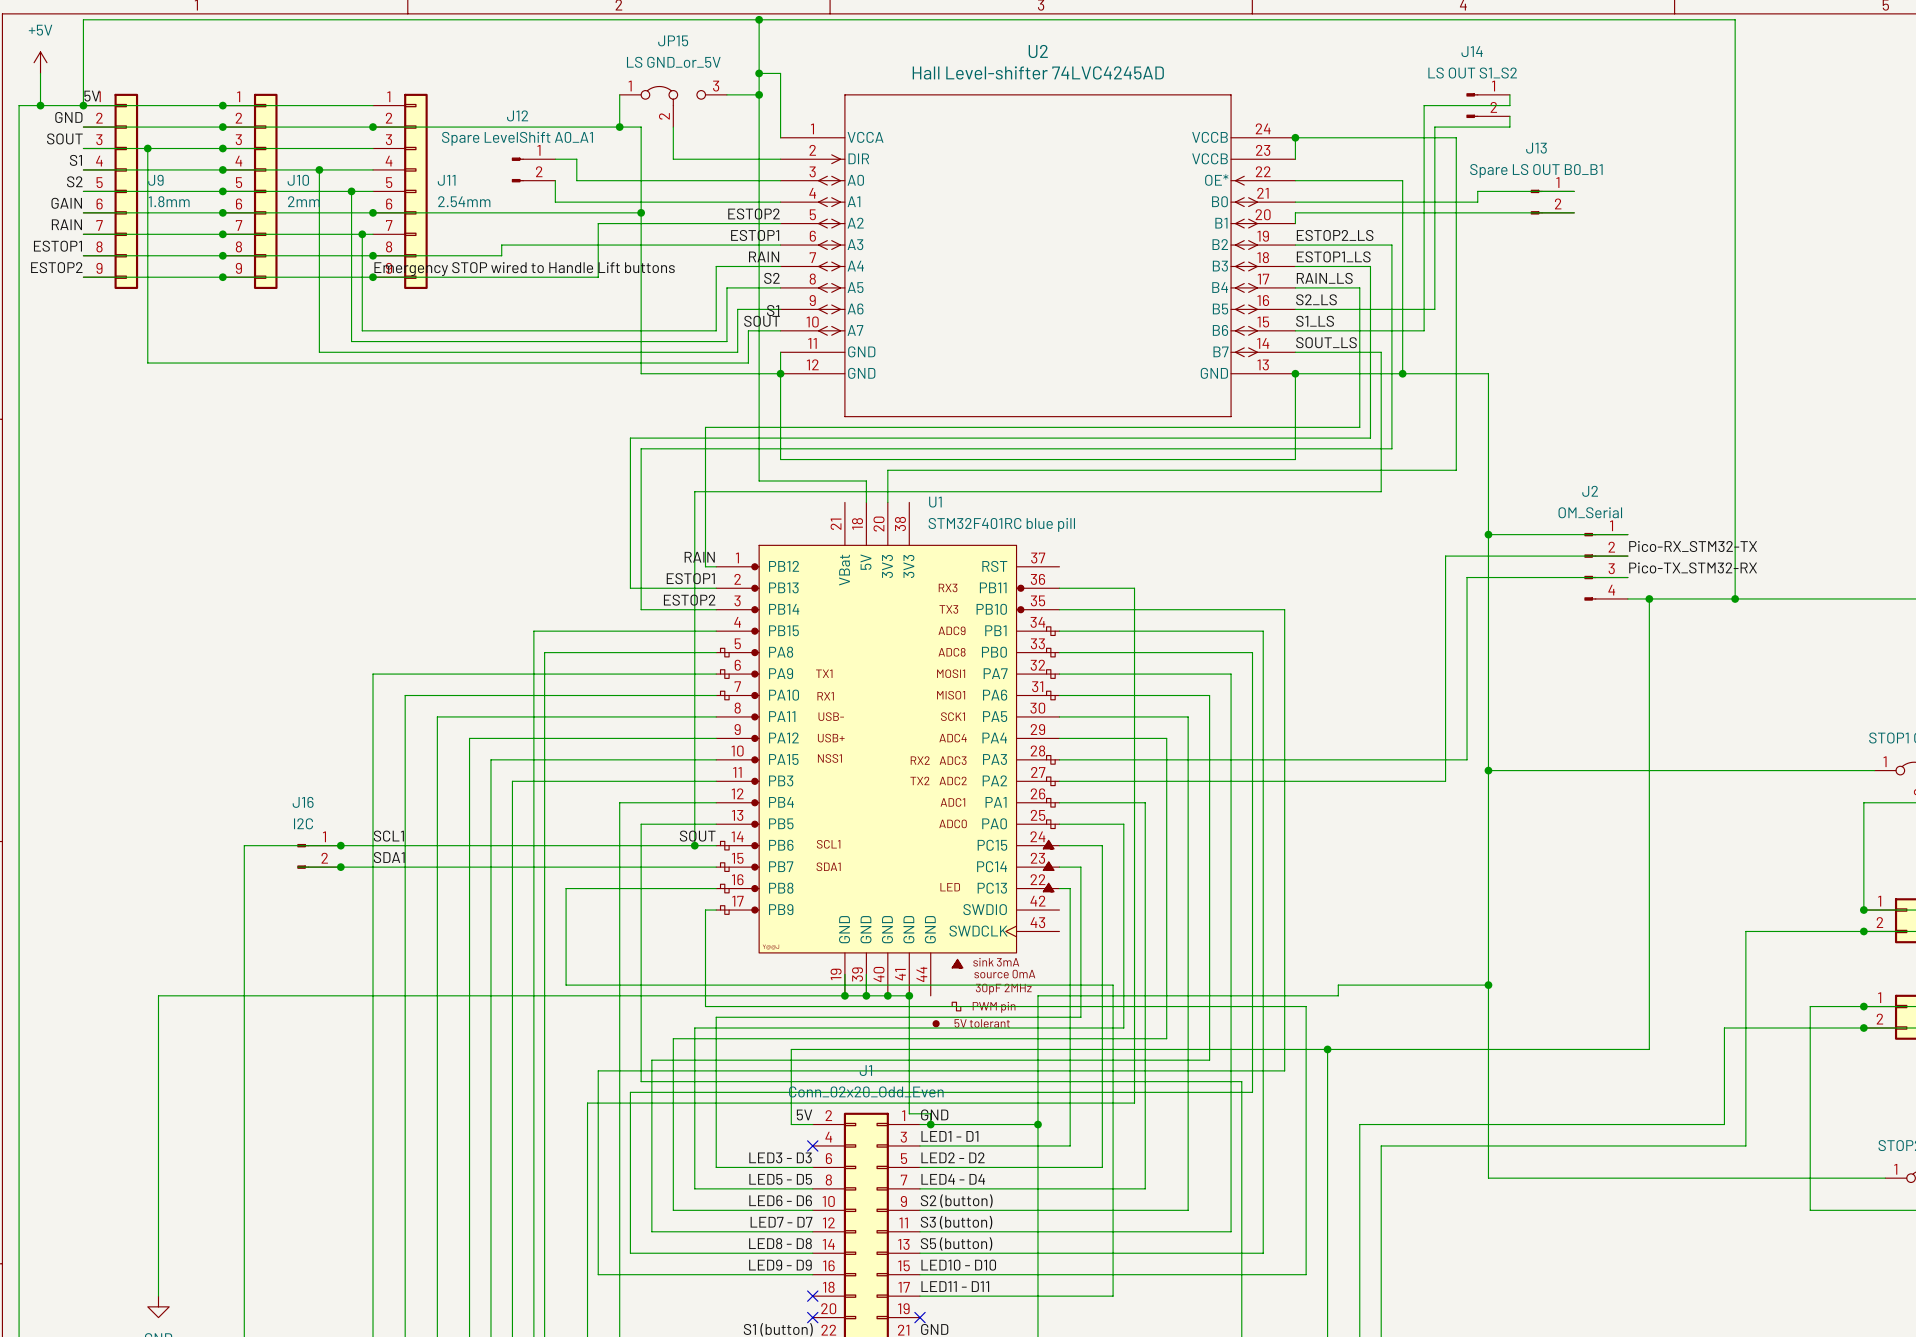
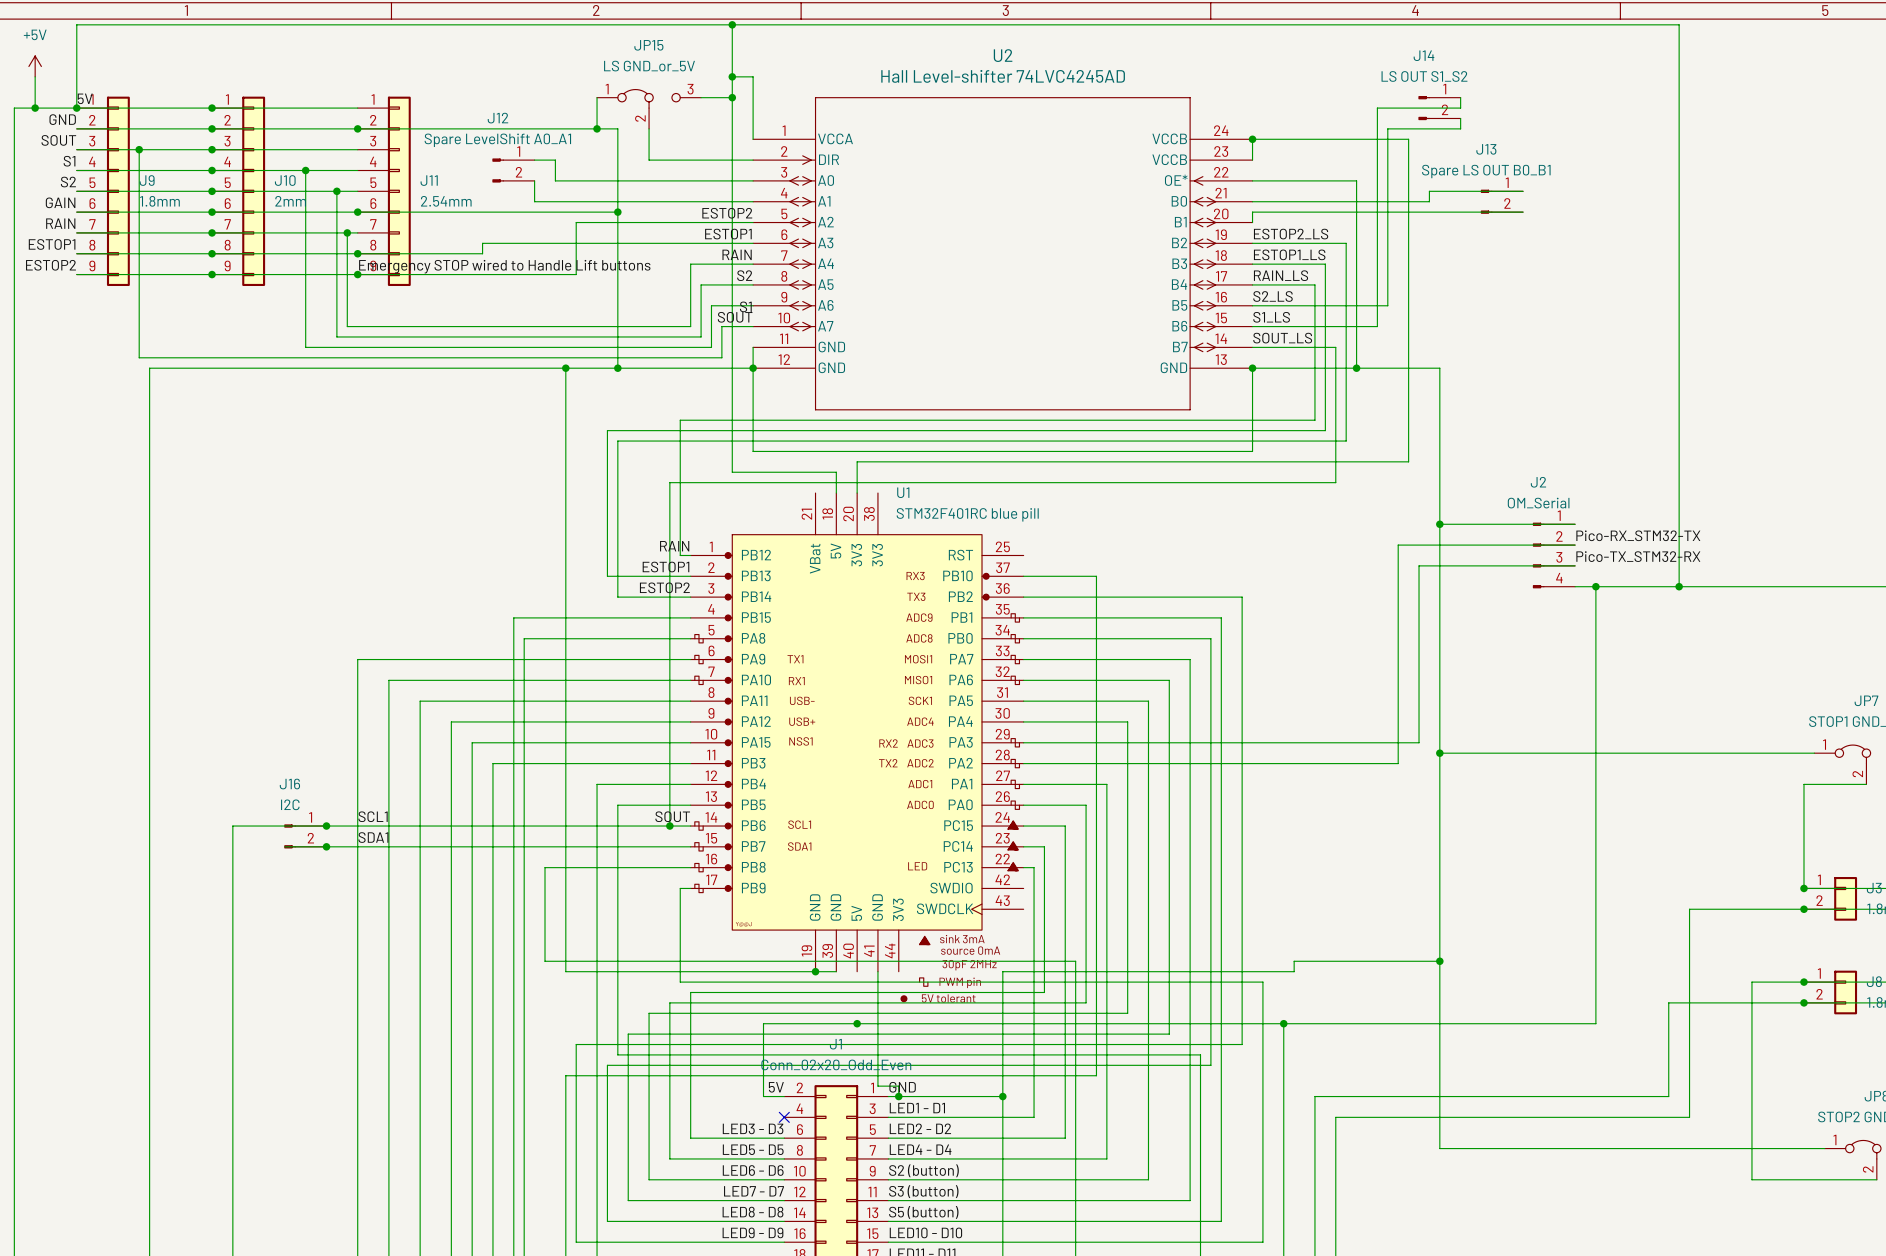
wire: none -> (565, 368) (565, 971)
junction: none -> (565, 368)
junction: none -> (617, 368)
U1 symbol: [716, 502, 1060, 1027] -> [690, 493, 1024, 1002]
wire: (866, 974) (866, 995) (909, 995) -> none
wire: (158, 995) (587, 995) -> (149, 971) (149, 368) (617, 368)
junction: (866, 995) -> none
junction: (887, 995) -> none
junction: (909, 995) -> none
junction: none -> (857, 1023)

